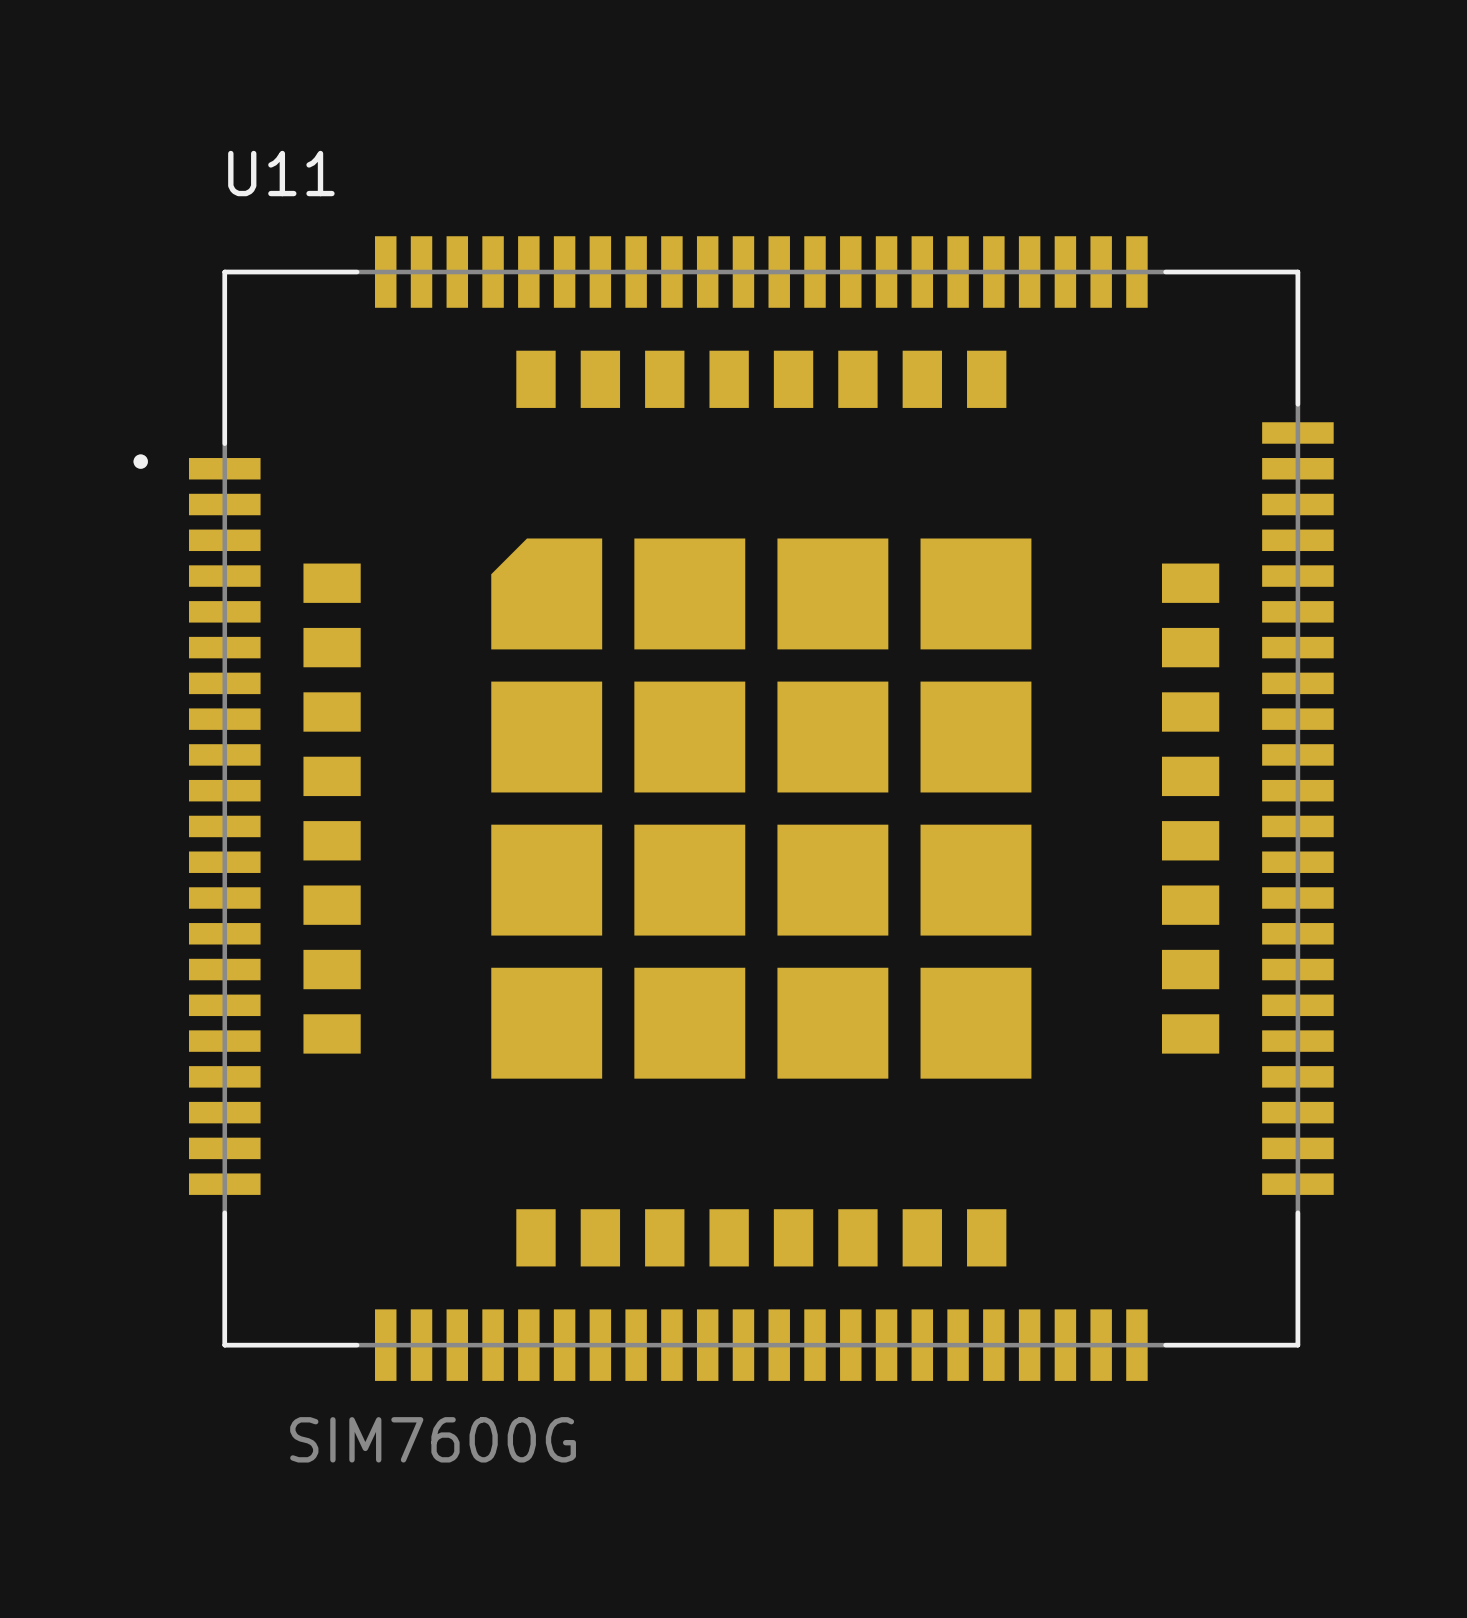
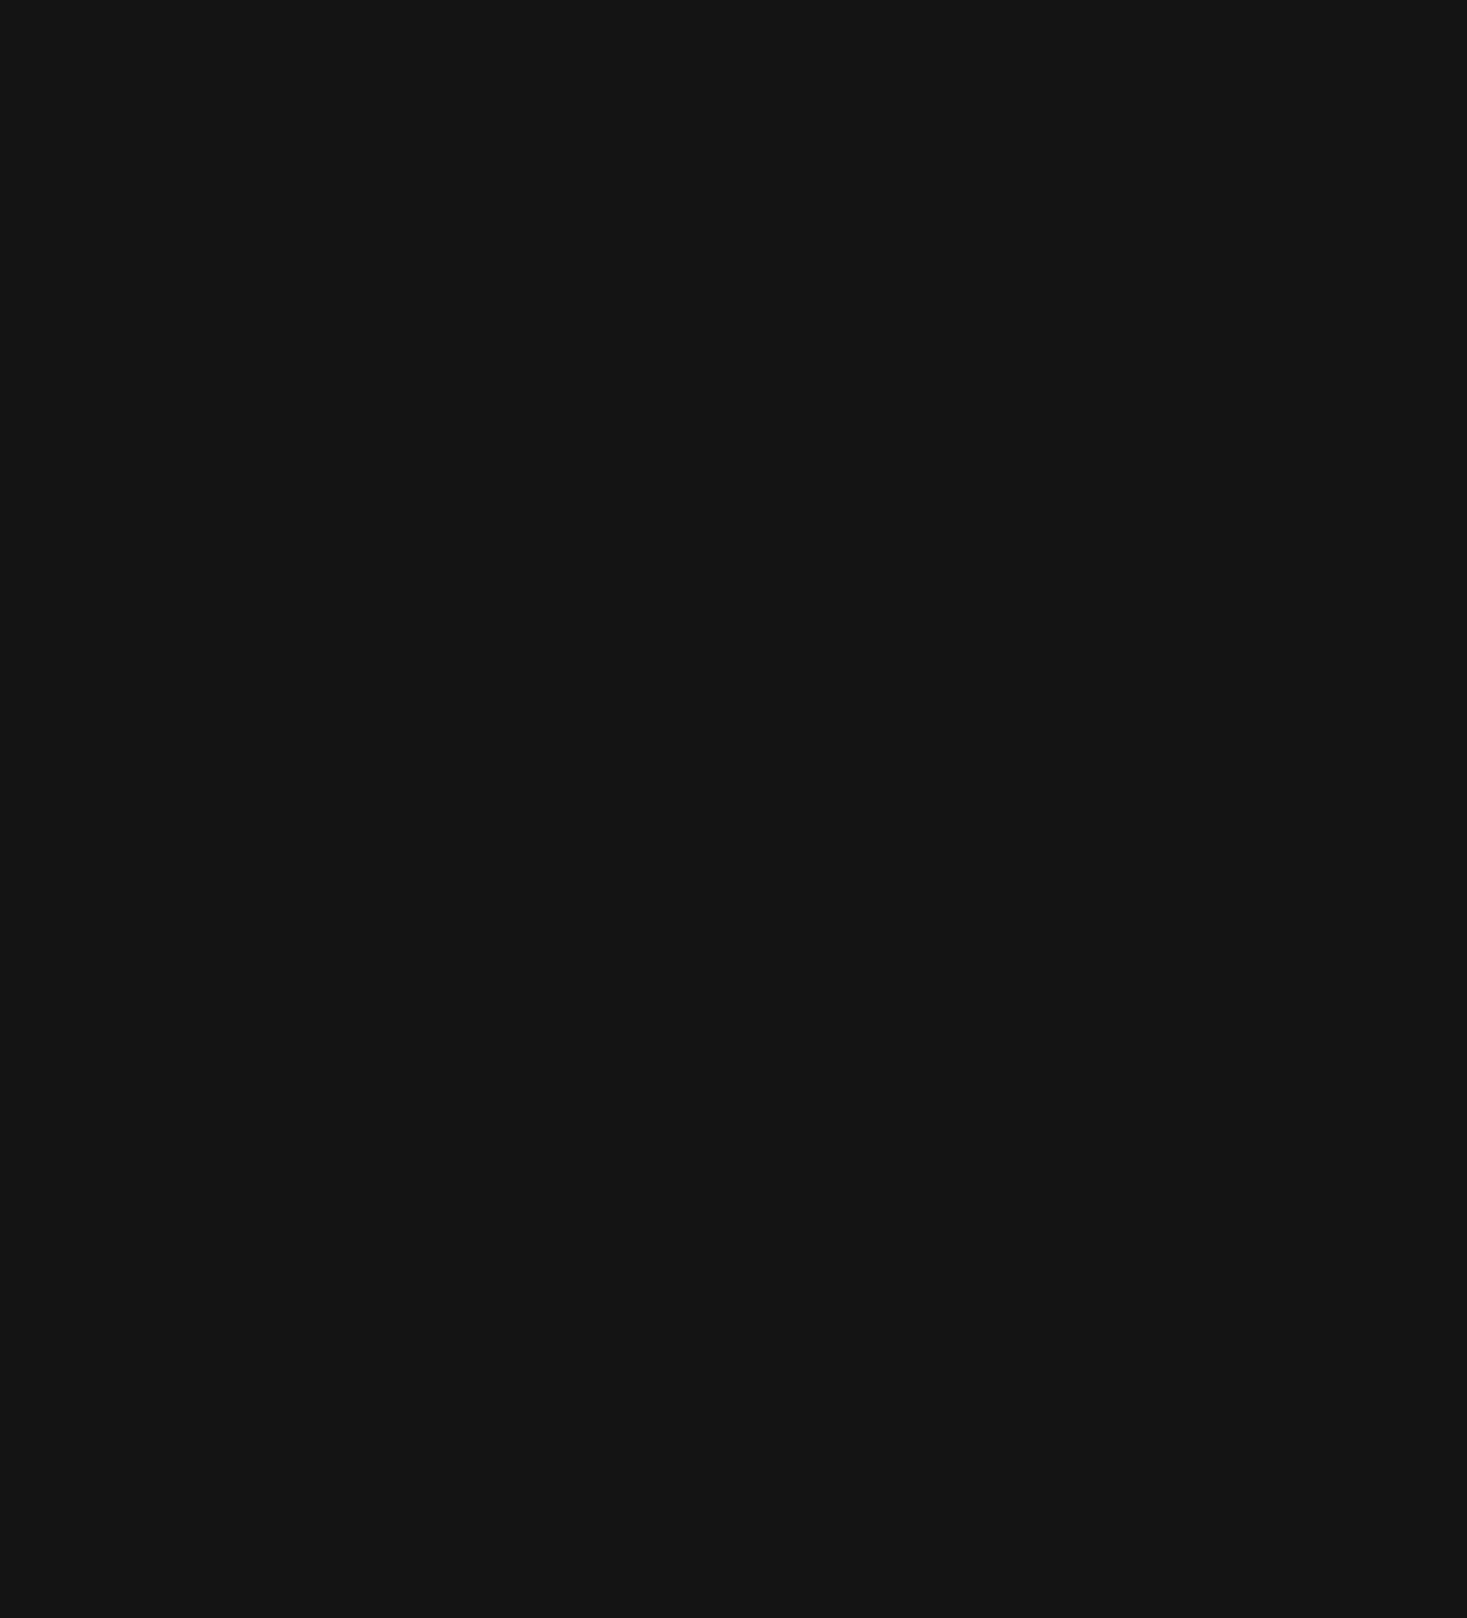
U11: SIM7600G (733, 808) -> none

